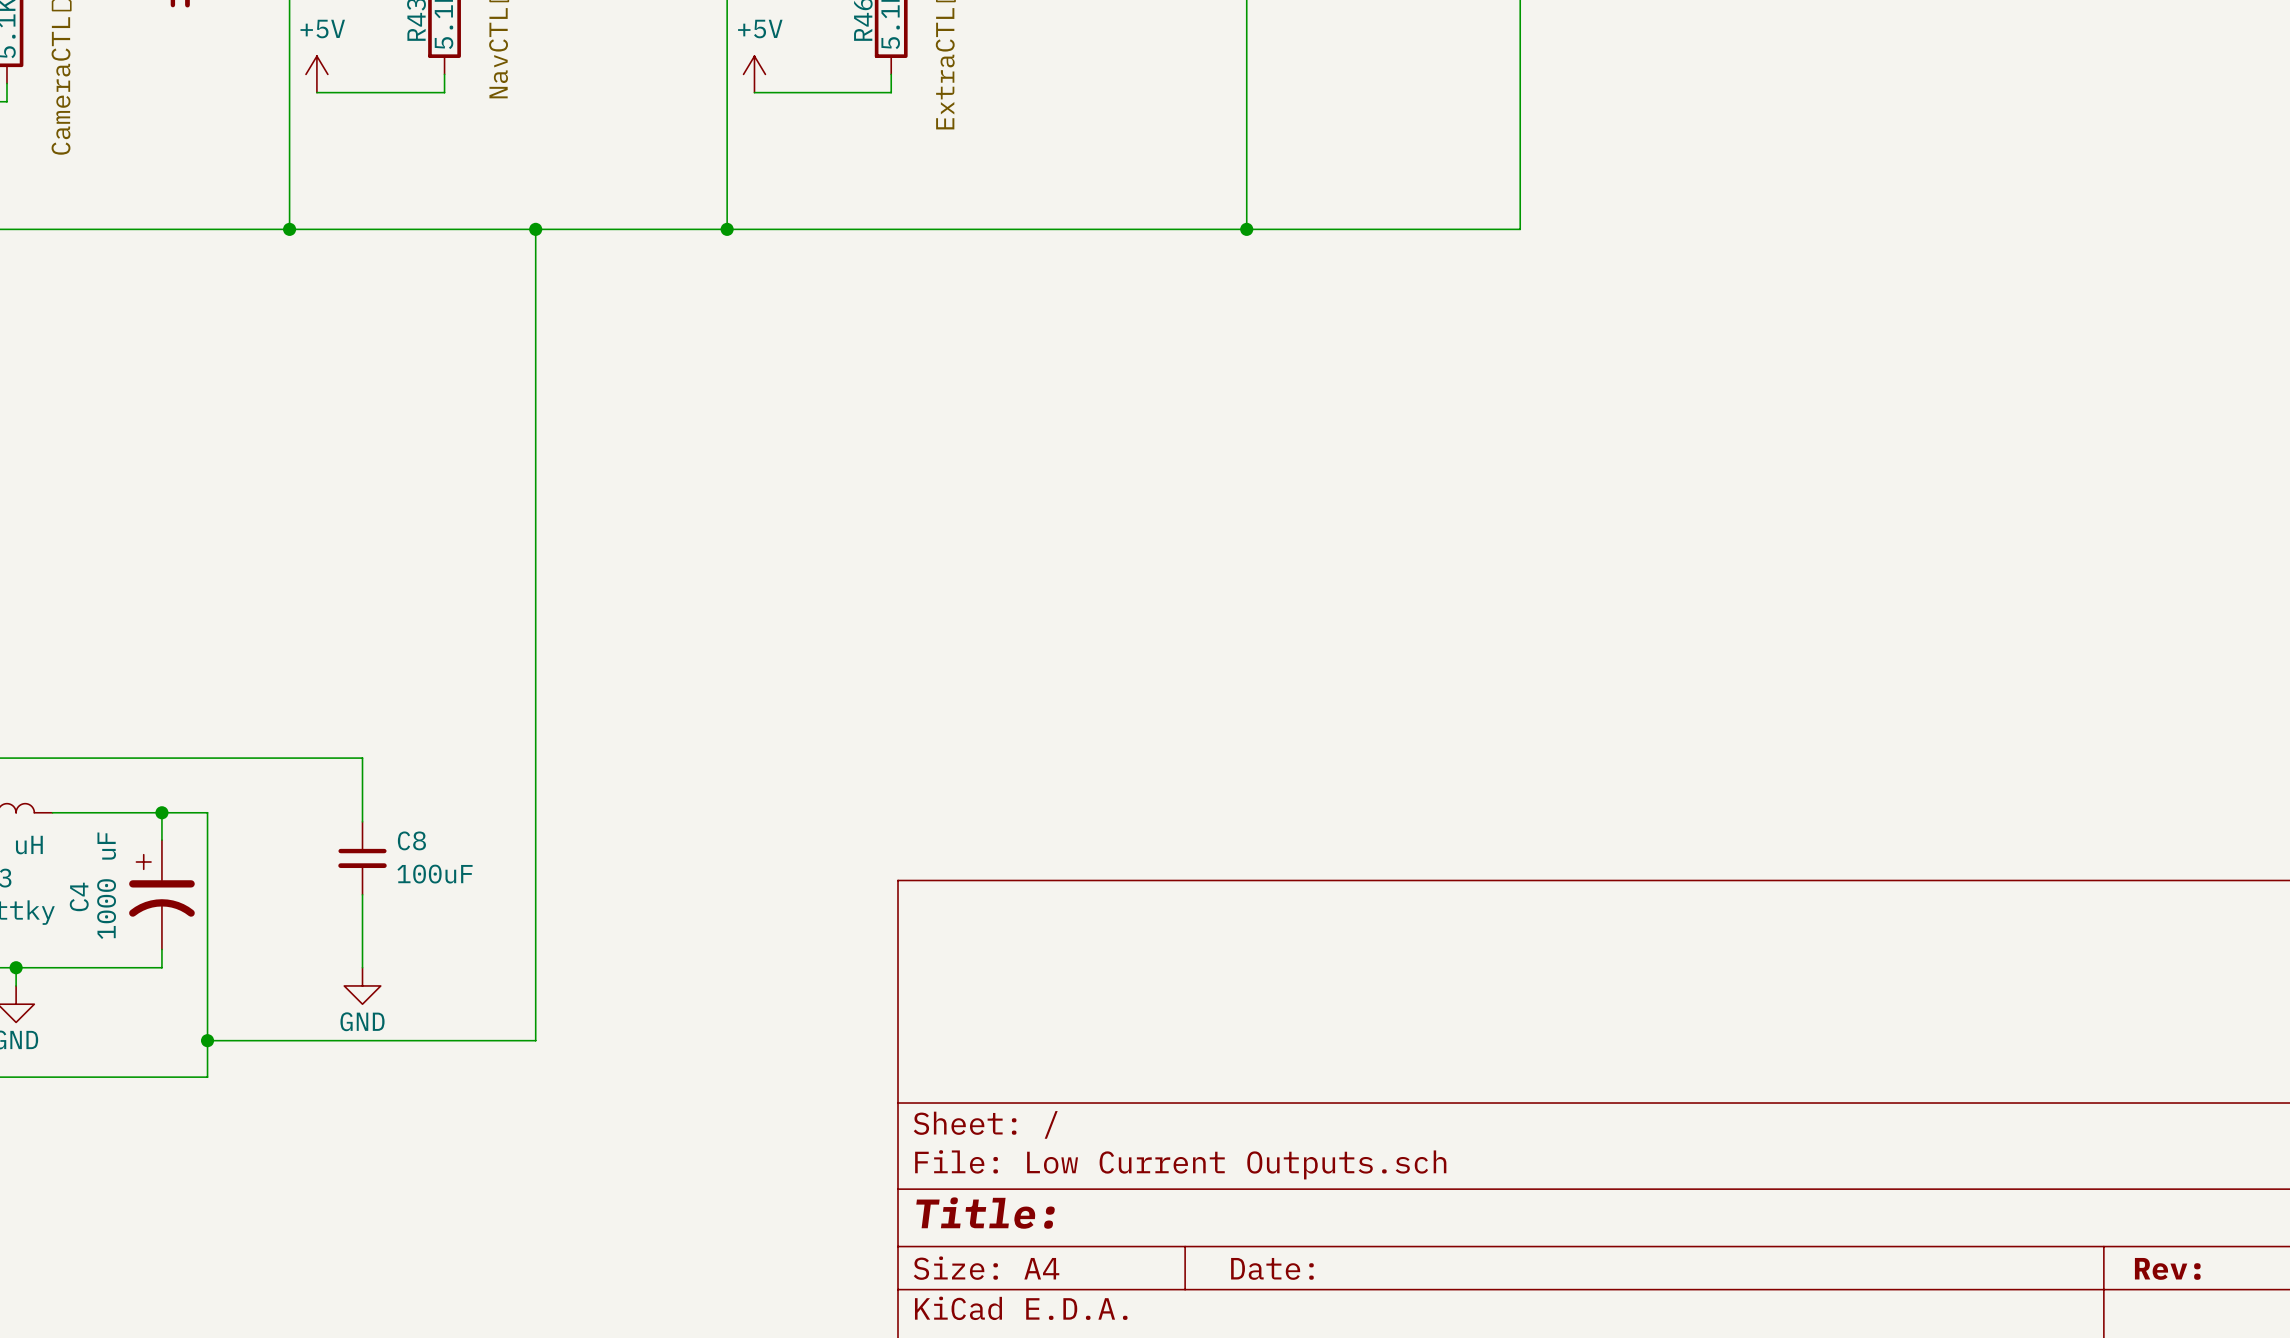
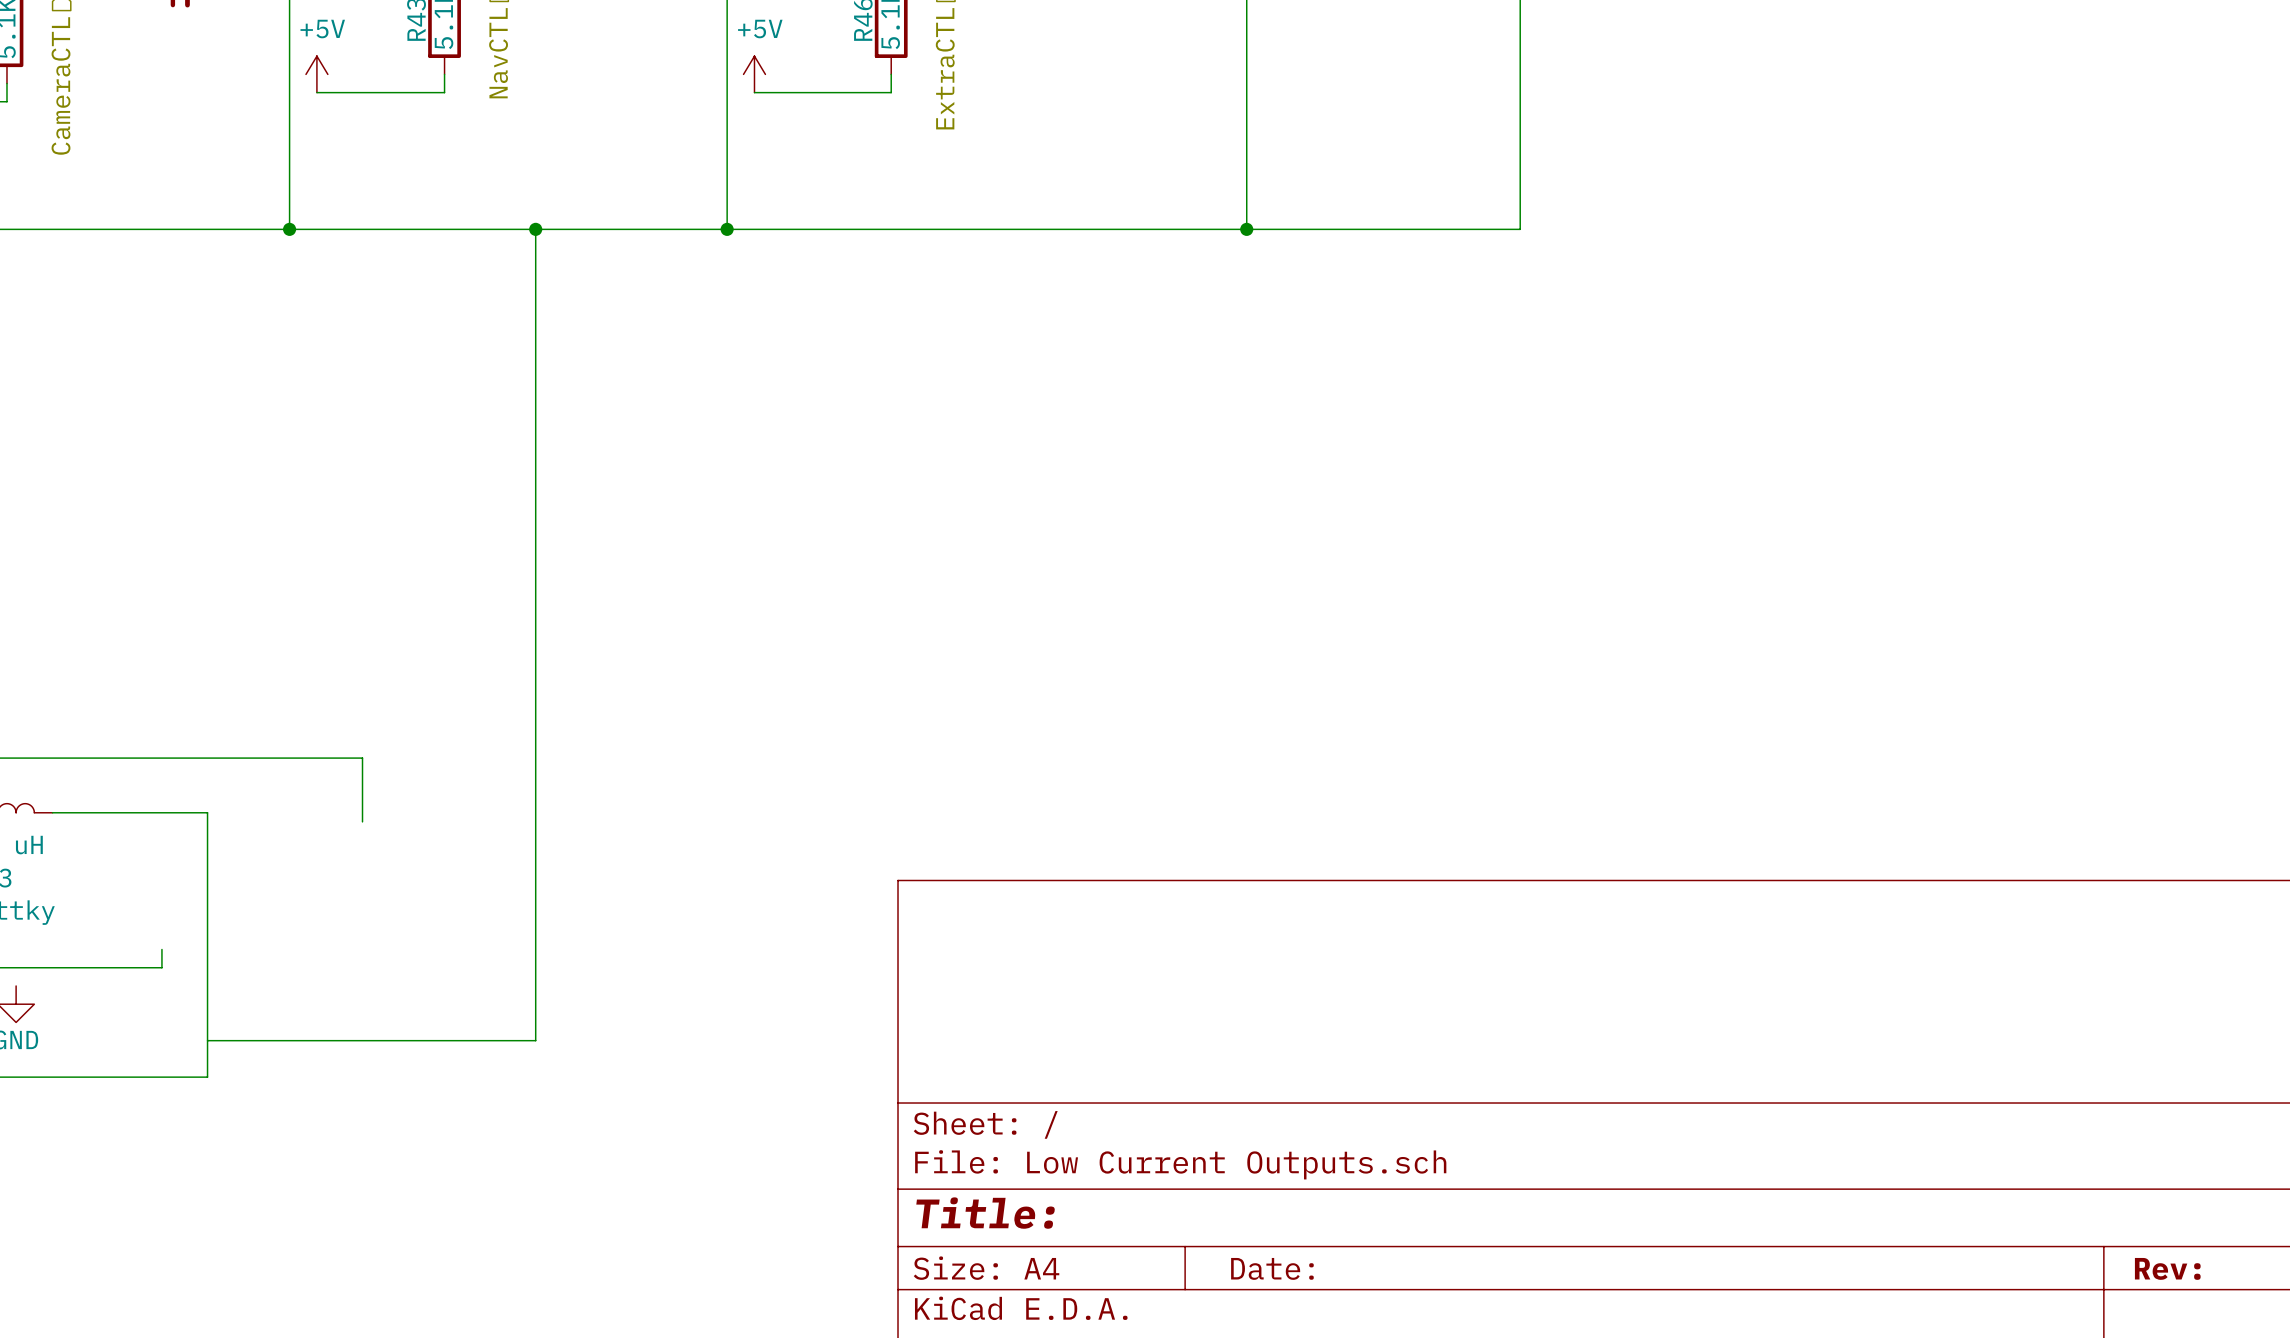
wire: (161, 812) (161, 840) -> none
junction: (161, 812) -> none
C8: 100uF (362, 858) -> none
C4: 1000 uF (161, 894) -> none
wire: (362, 894) (362, 967) -> none
wire: (16, 967) (16, 985) -> none
junction: (16, 967) -> none
power symbol: GND (362, 985) -> none
junction: (207, 1040) -> none

